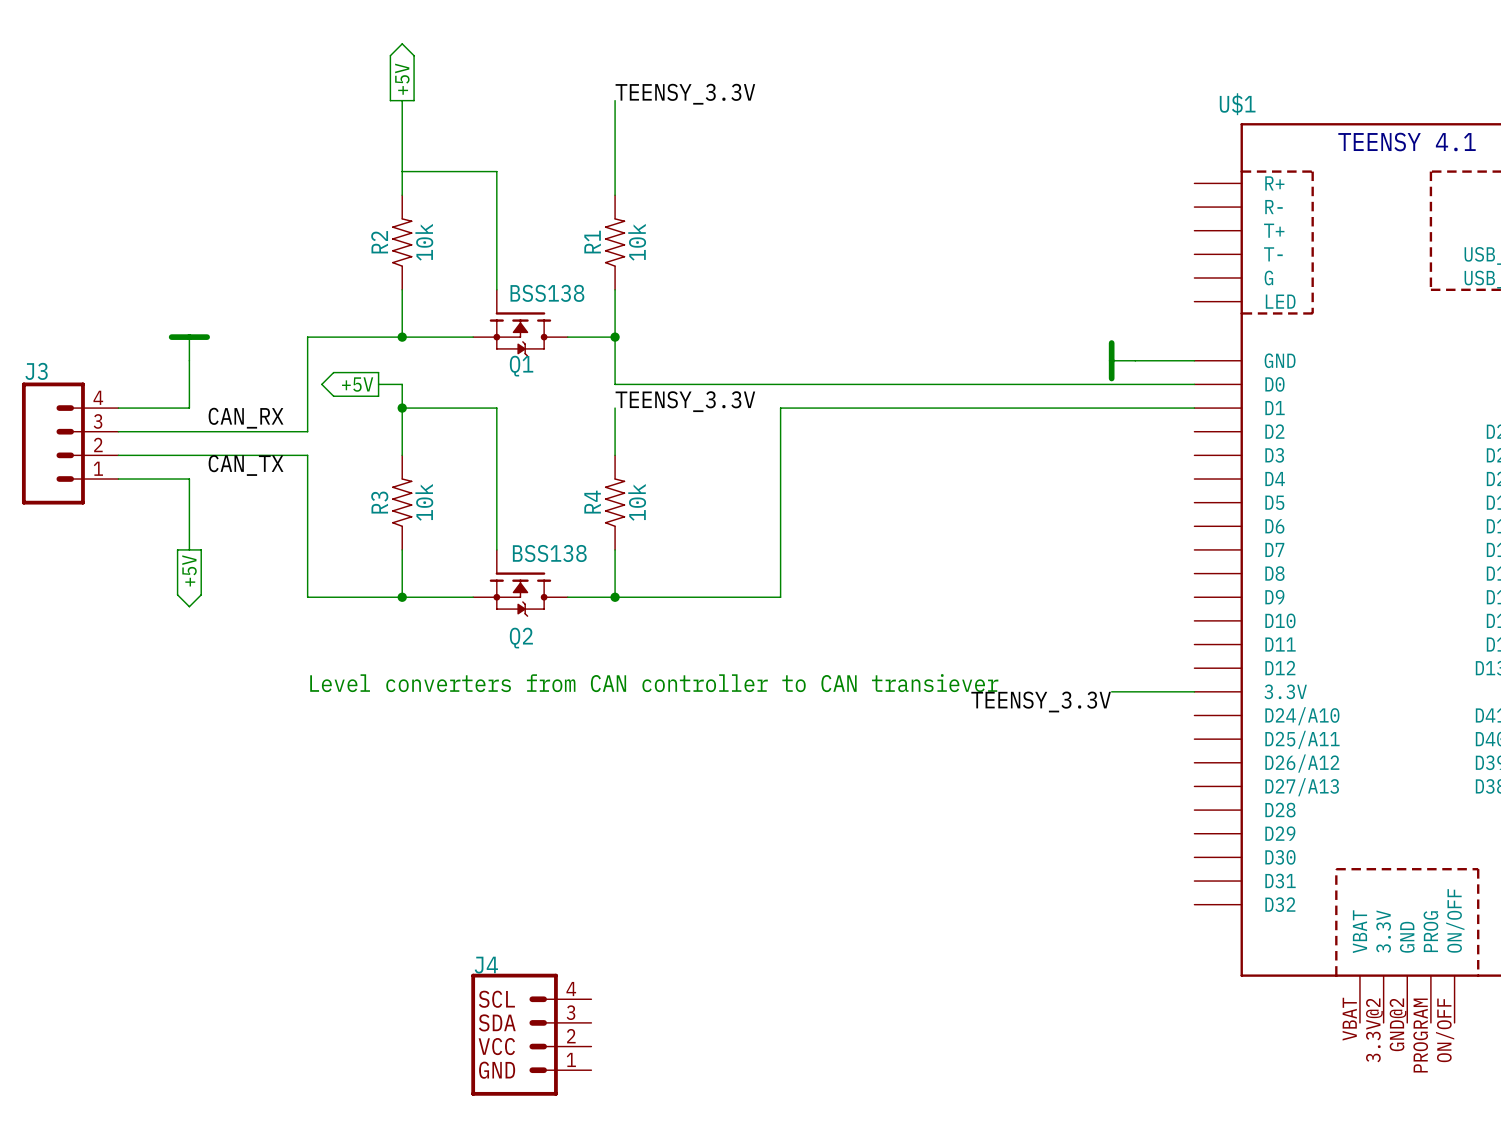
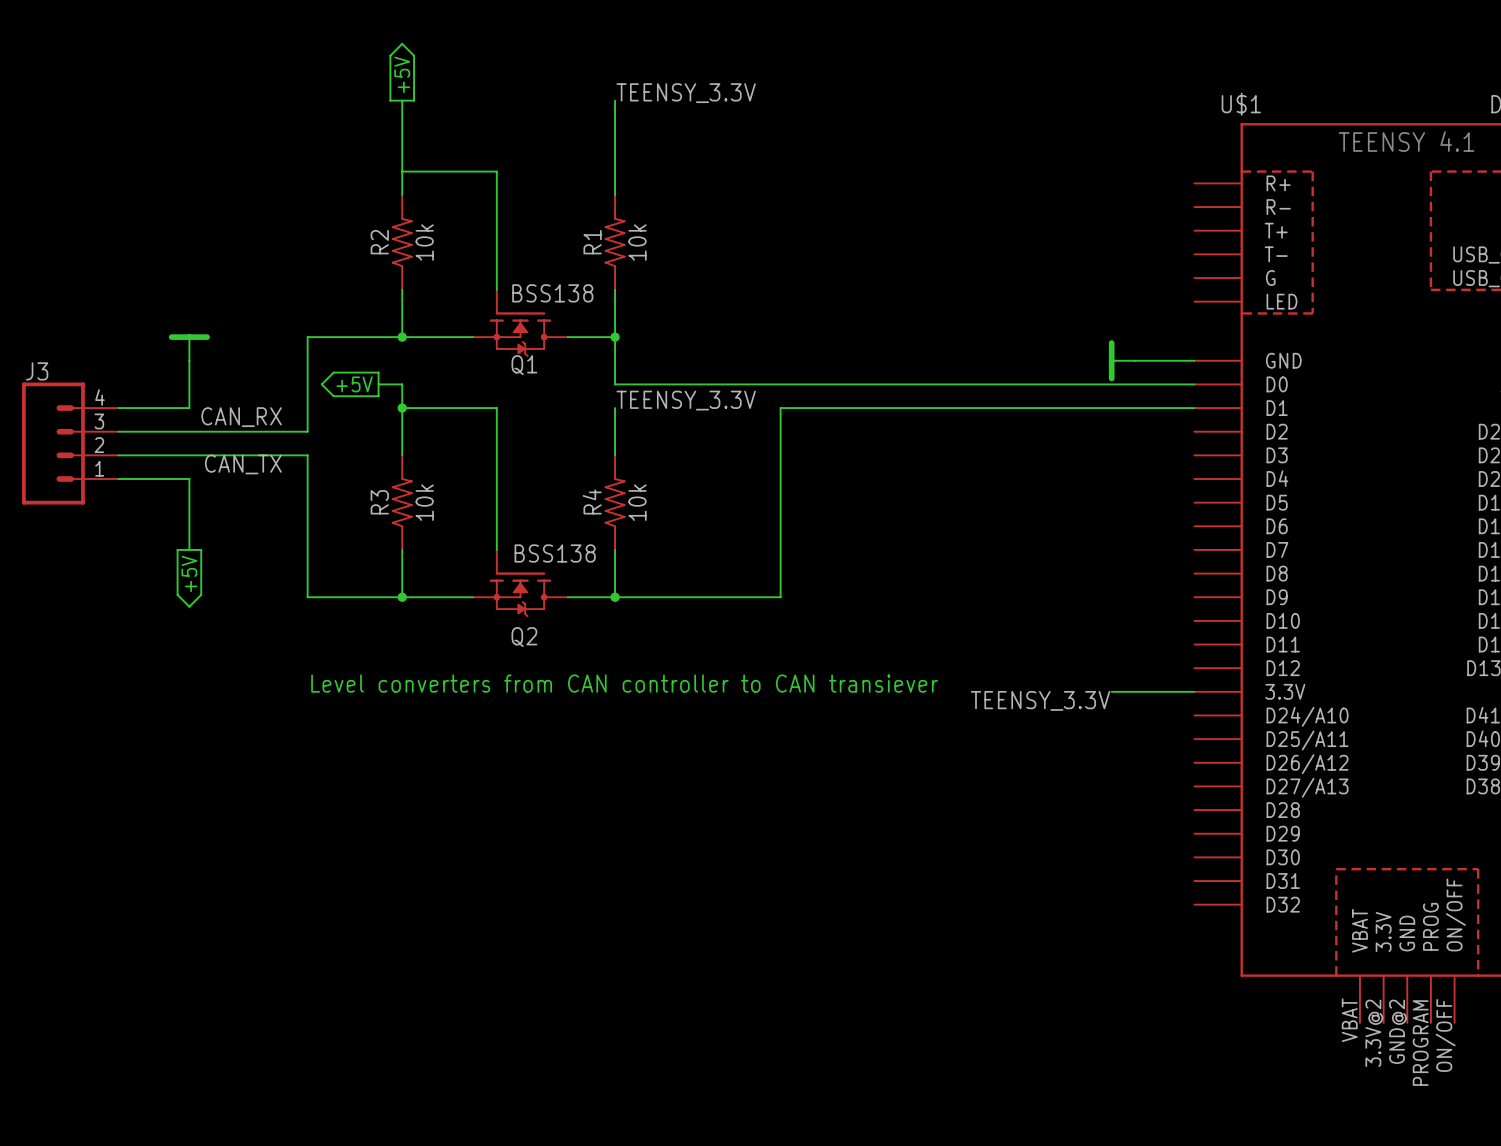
J4: (531, 1034) -> none

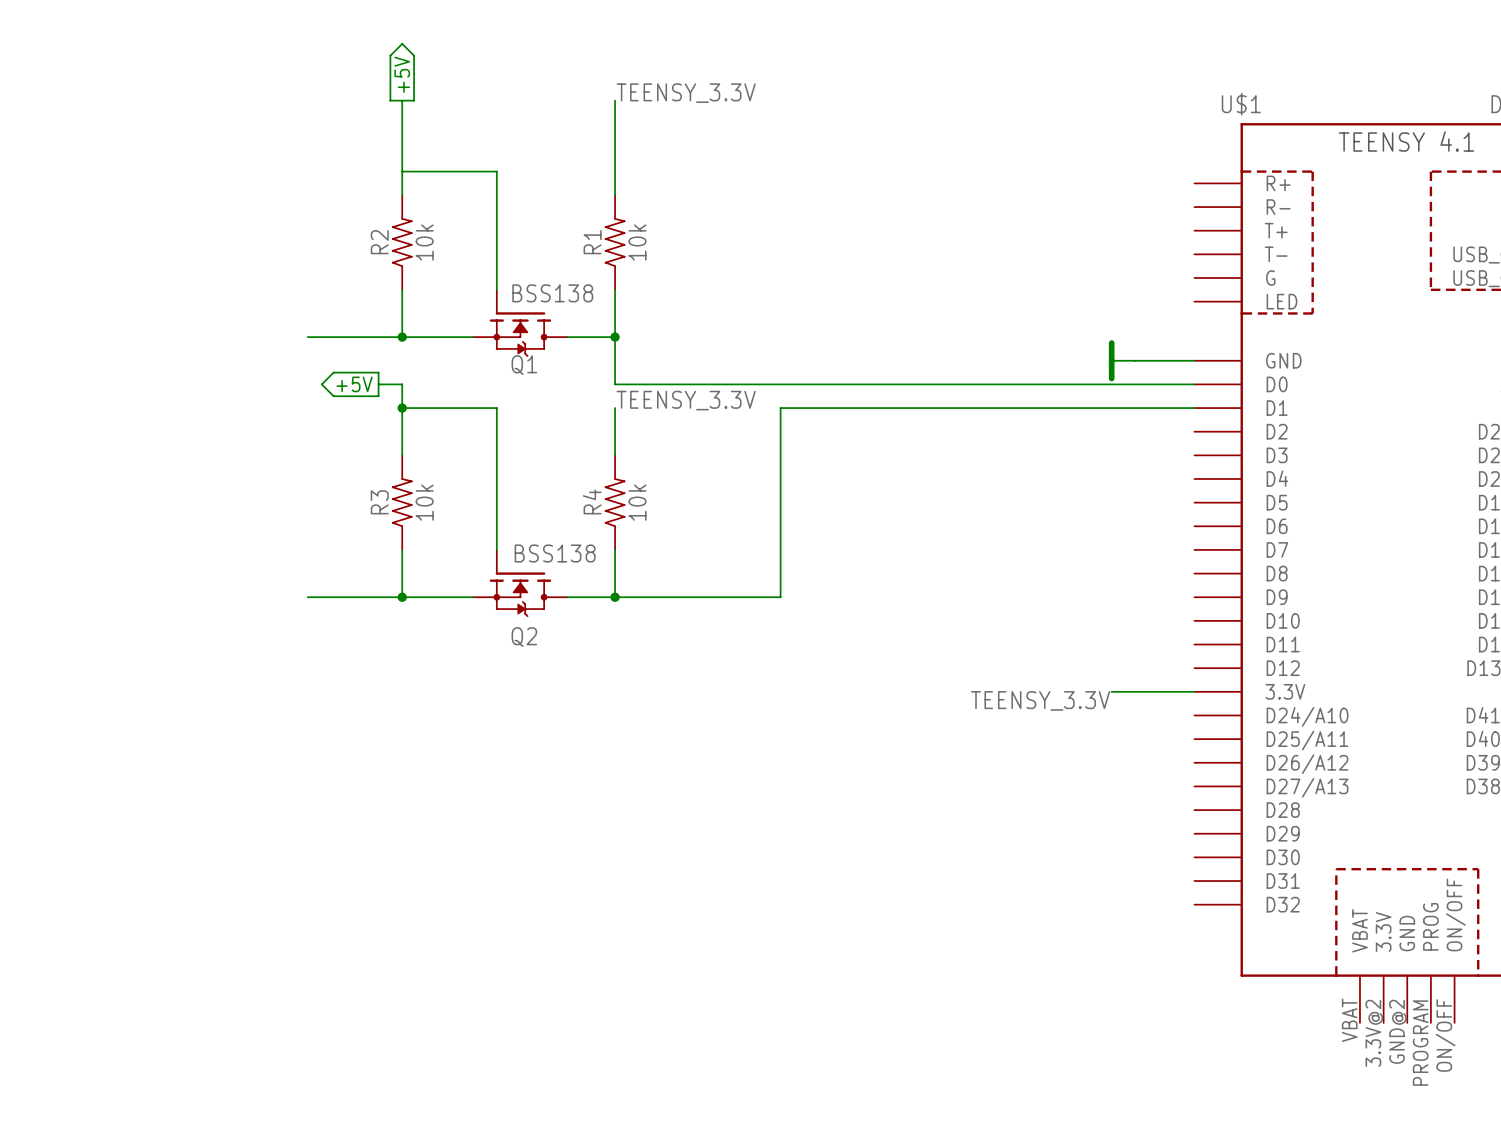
wire: (307, 337) (307, 431) (118, 431) -> none
power symbol: (189, 347) -> none
wire: (189, 360) (189, 408) (118, 408) -> none
label: CAN_RX (241, 417) -> none
J3: (70, 443) -> none
wire: (118, 455) (307, 455) (307, 597) -> none
label: CAN_TX (243, 464) -> none
wire: (118, 479) (189, 479) (189, 549) -> none
power symbol: (189, 578) -> none
text: Level converters from CAN controller to CAN transiever (624, 683) -> none

